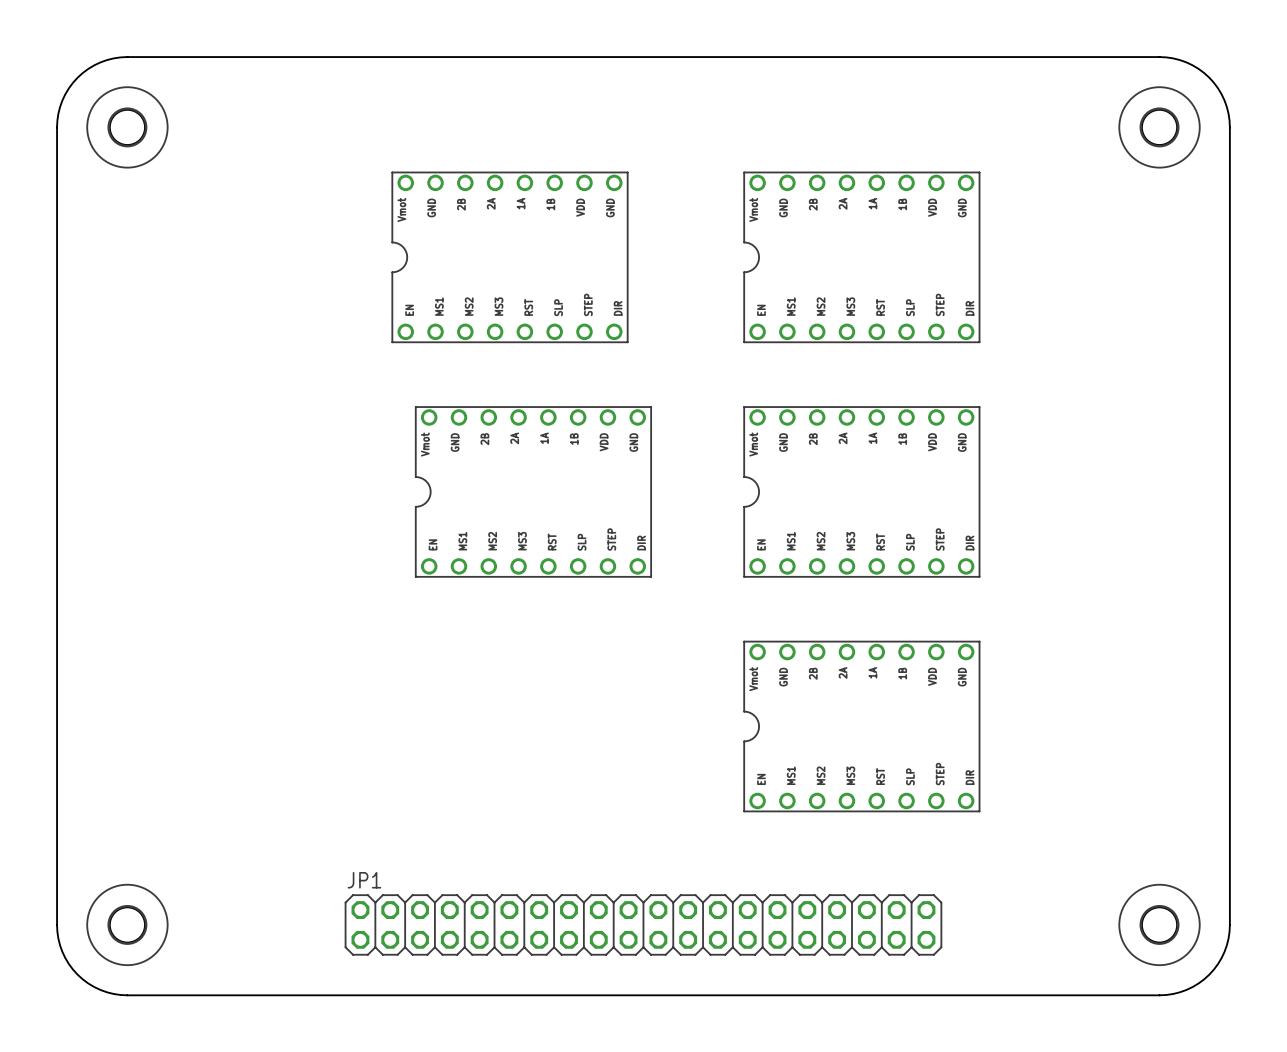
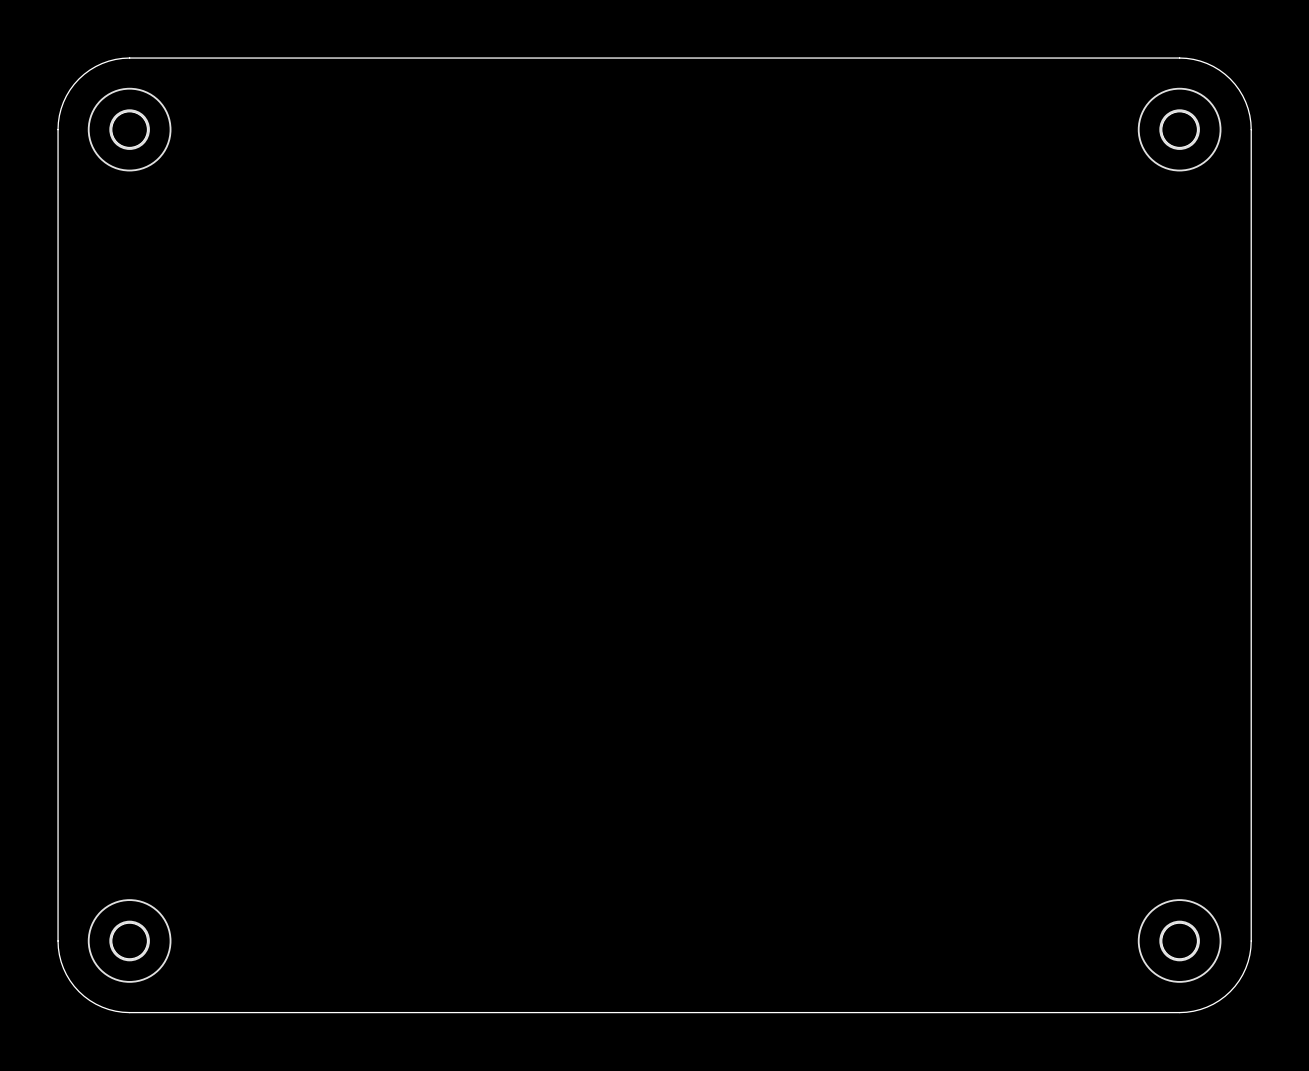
part: (510, 257) -> none
part: (861, 257) -> none
part: (533, 491) -> none
part: (861, 491) -> none
part: (861, 726) -> none
JP1: (643, 924) -> none

